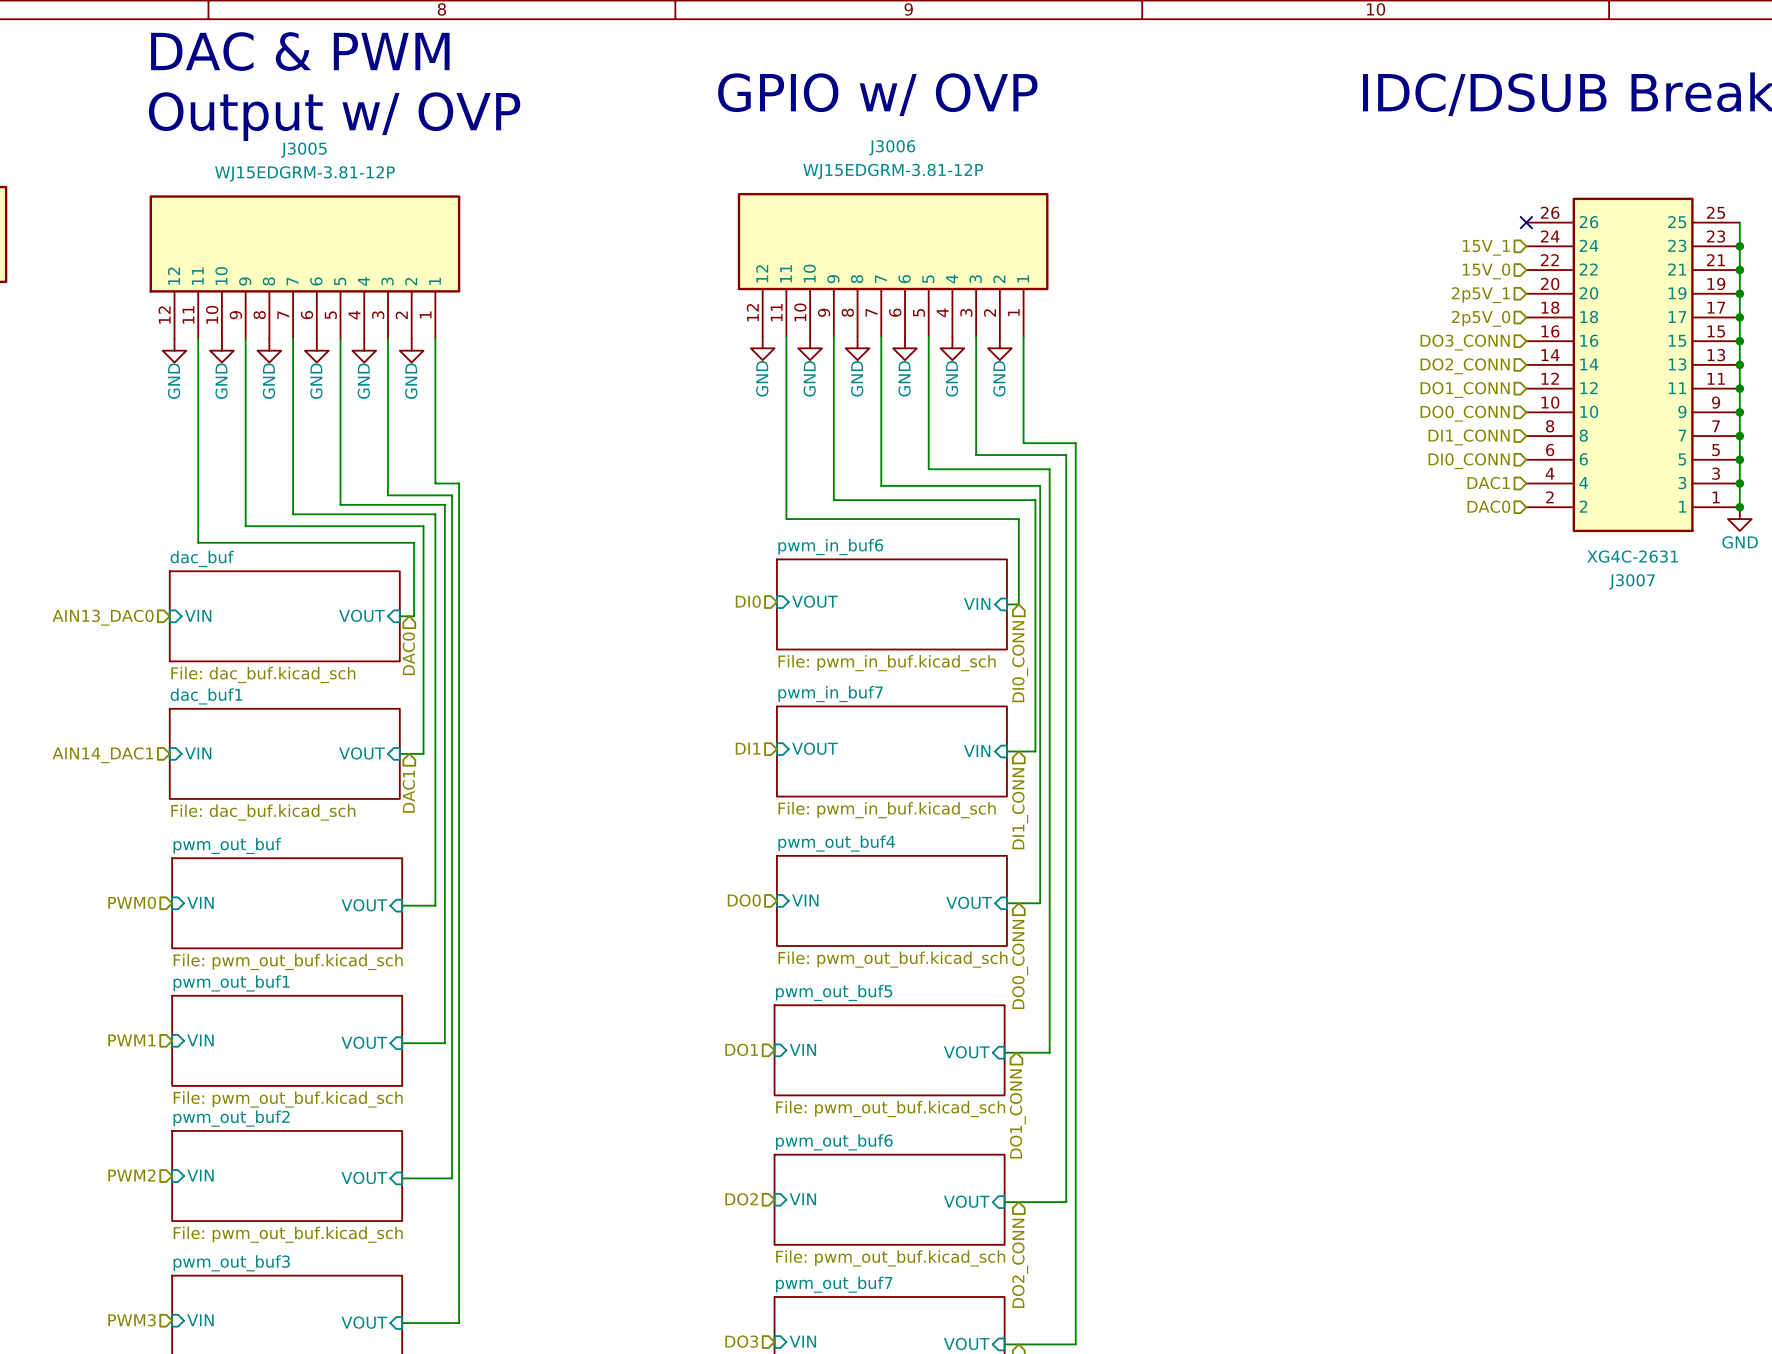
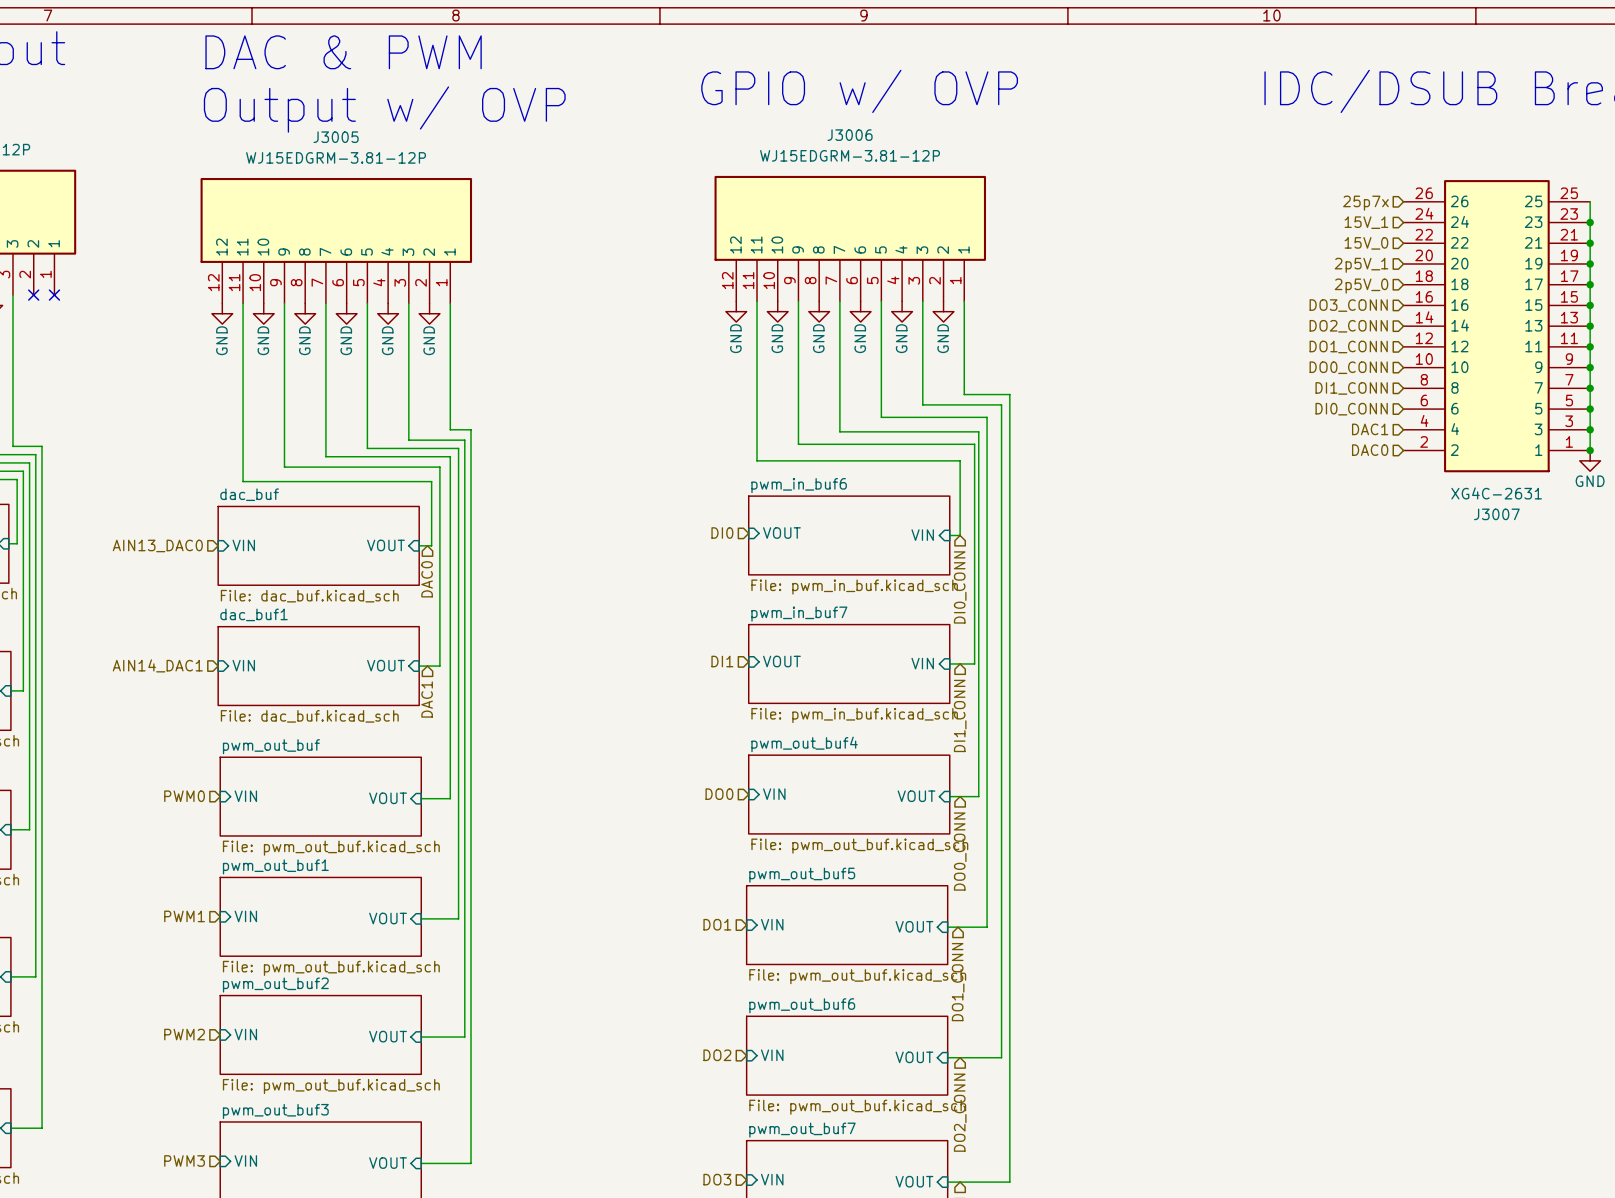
no-connect mark: (1526, 222) -> none
hierarchical label: none -> 25p7x (1365, 203)

